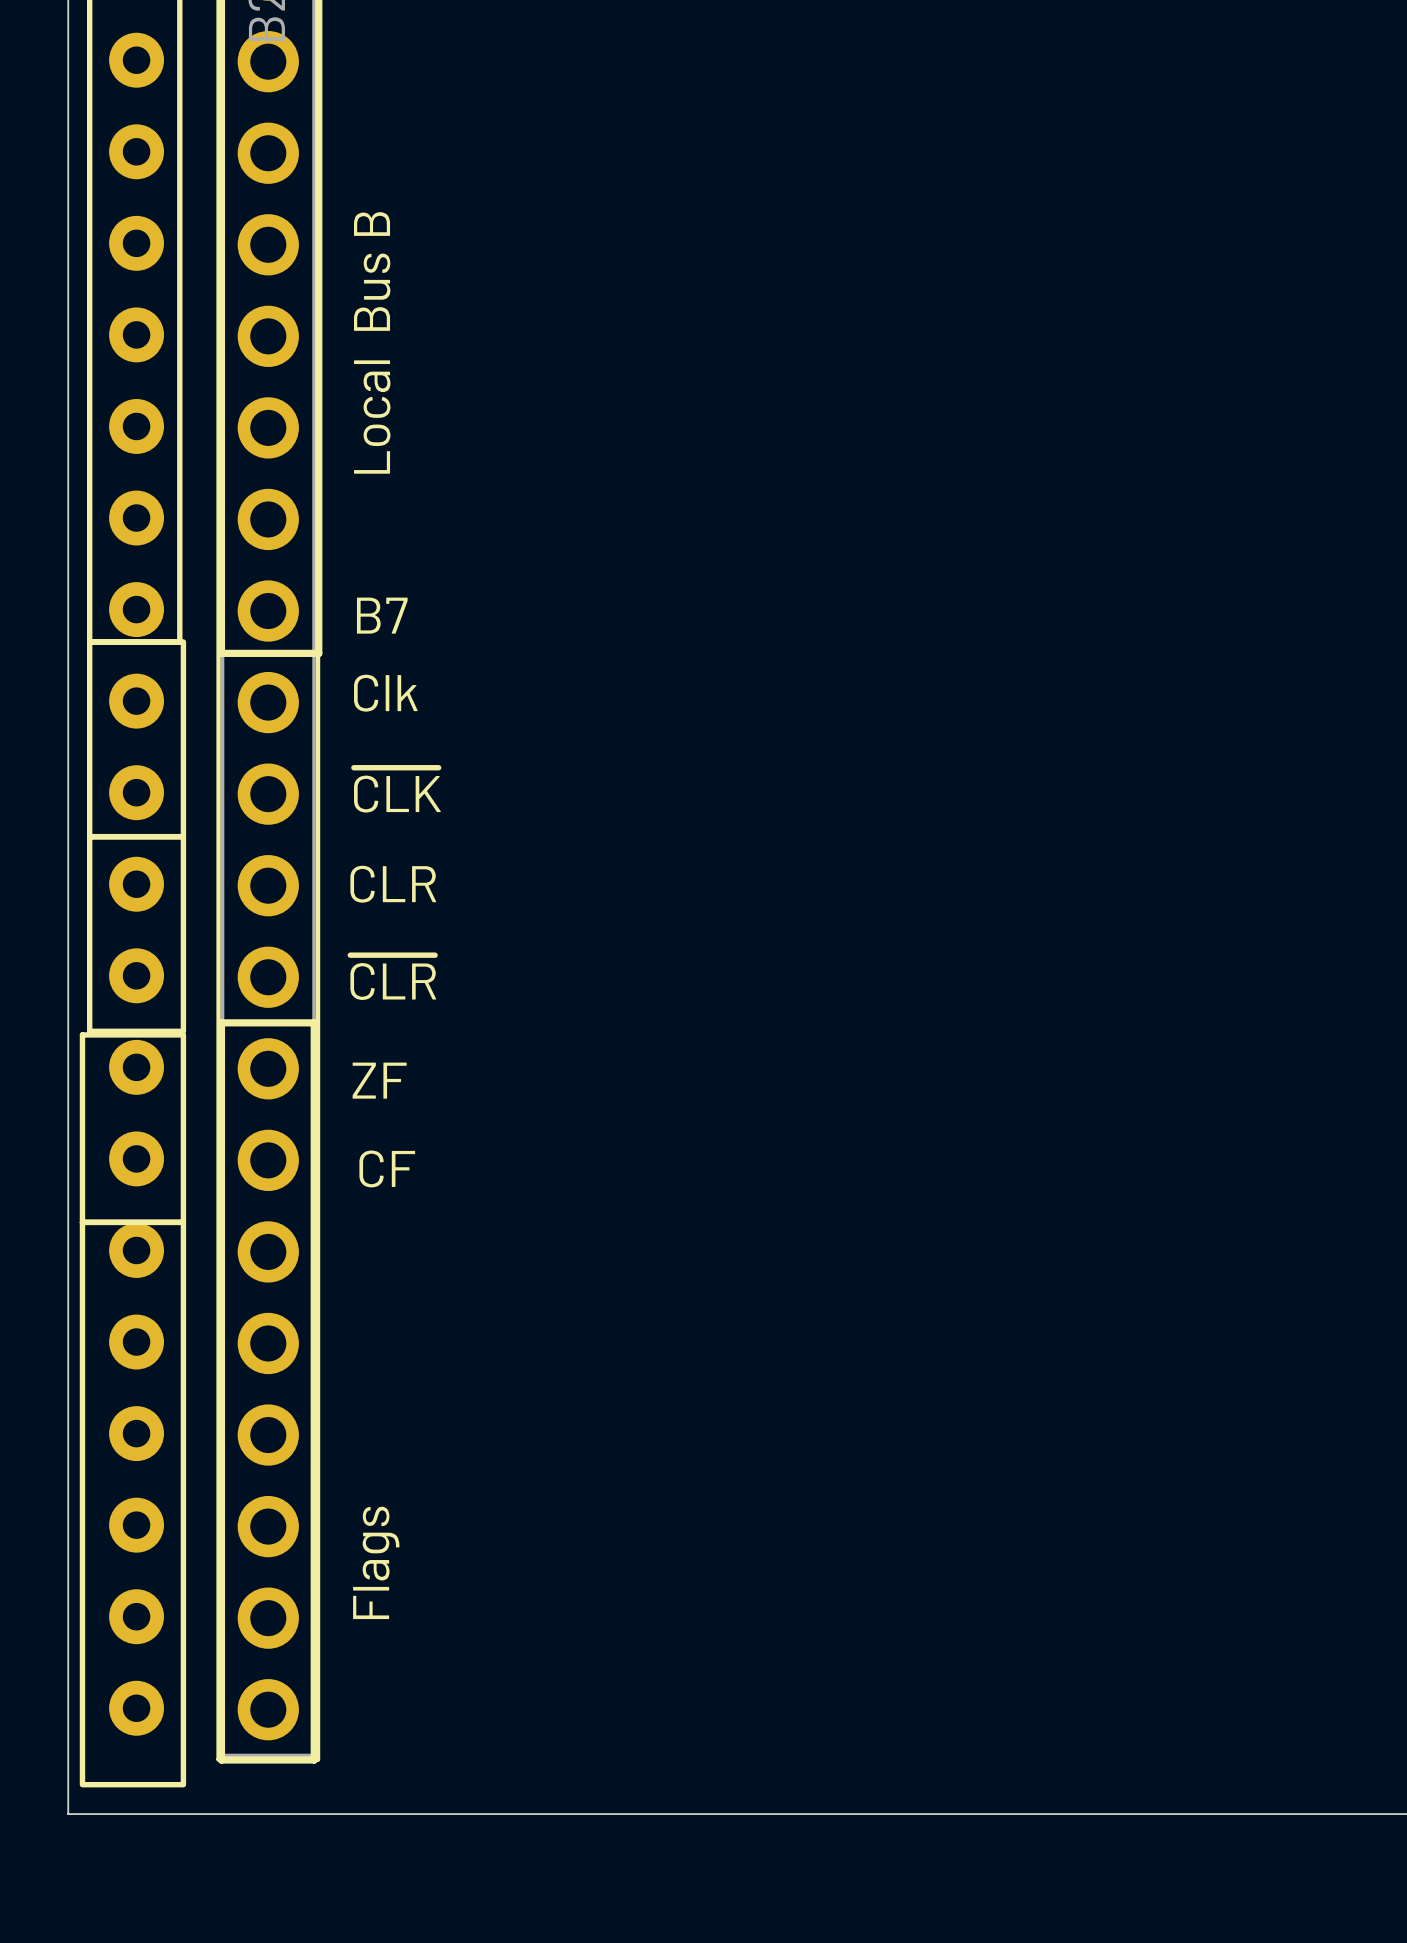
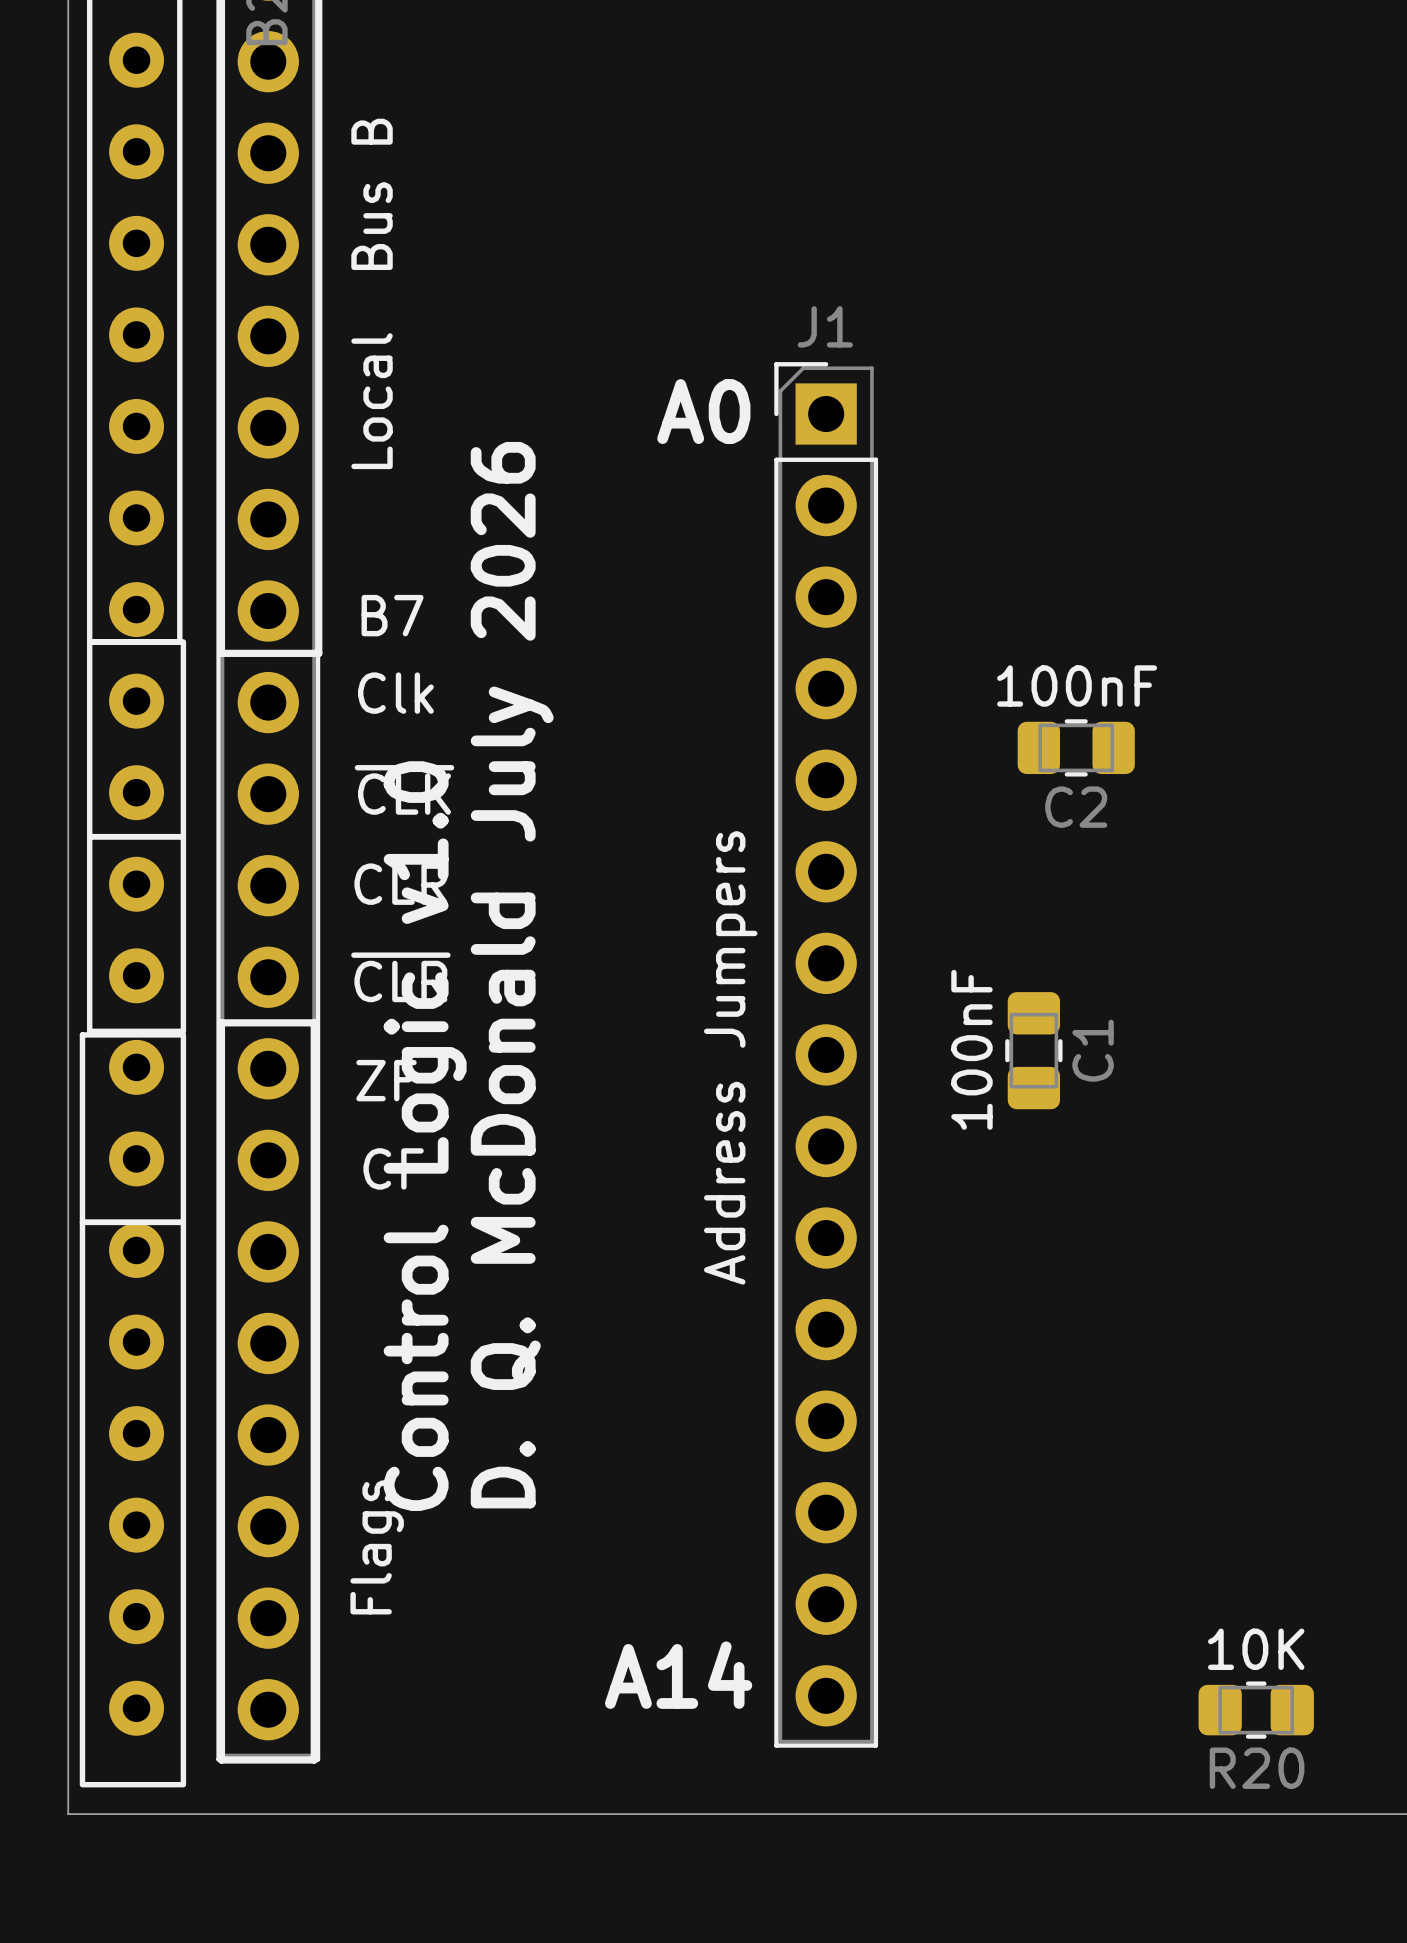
text: none -> A0 (703, 411)
C2: none -> 100nF (1076, 747)
C1: none -> 100nF (1033, 1050)
J1: none -> Address Jumpers (826, 1054)
text: none -> D. Q. McDonald July 2026 (512, 975)
text: none -> Control Logic v1.0 (425, 1136)
text: none -> A14 (678, 1675)
R20: none -> 10K (1256, 1710)

